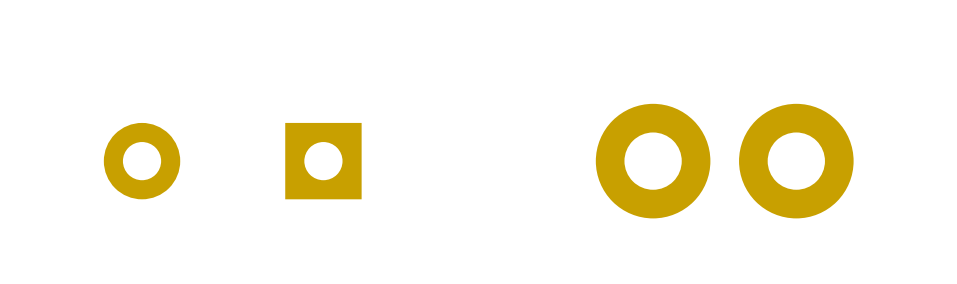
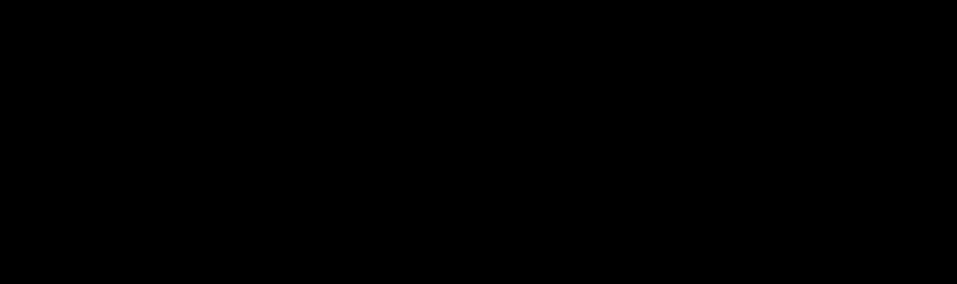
part: (232, 161) -> none
part: (724, 161) -> none

